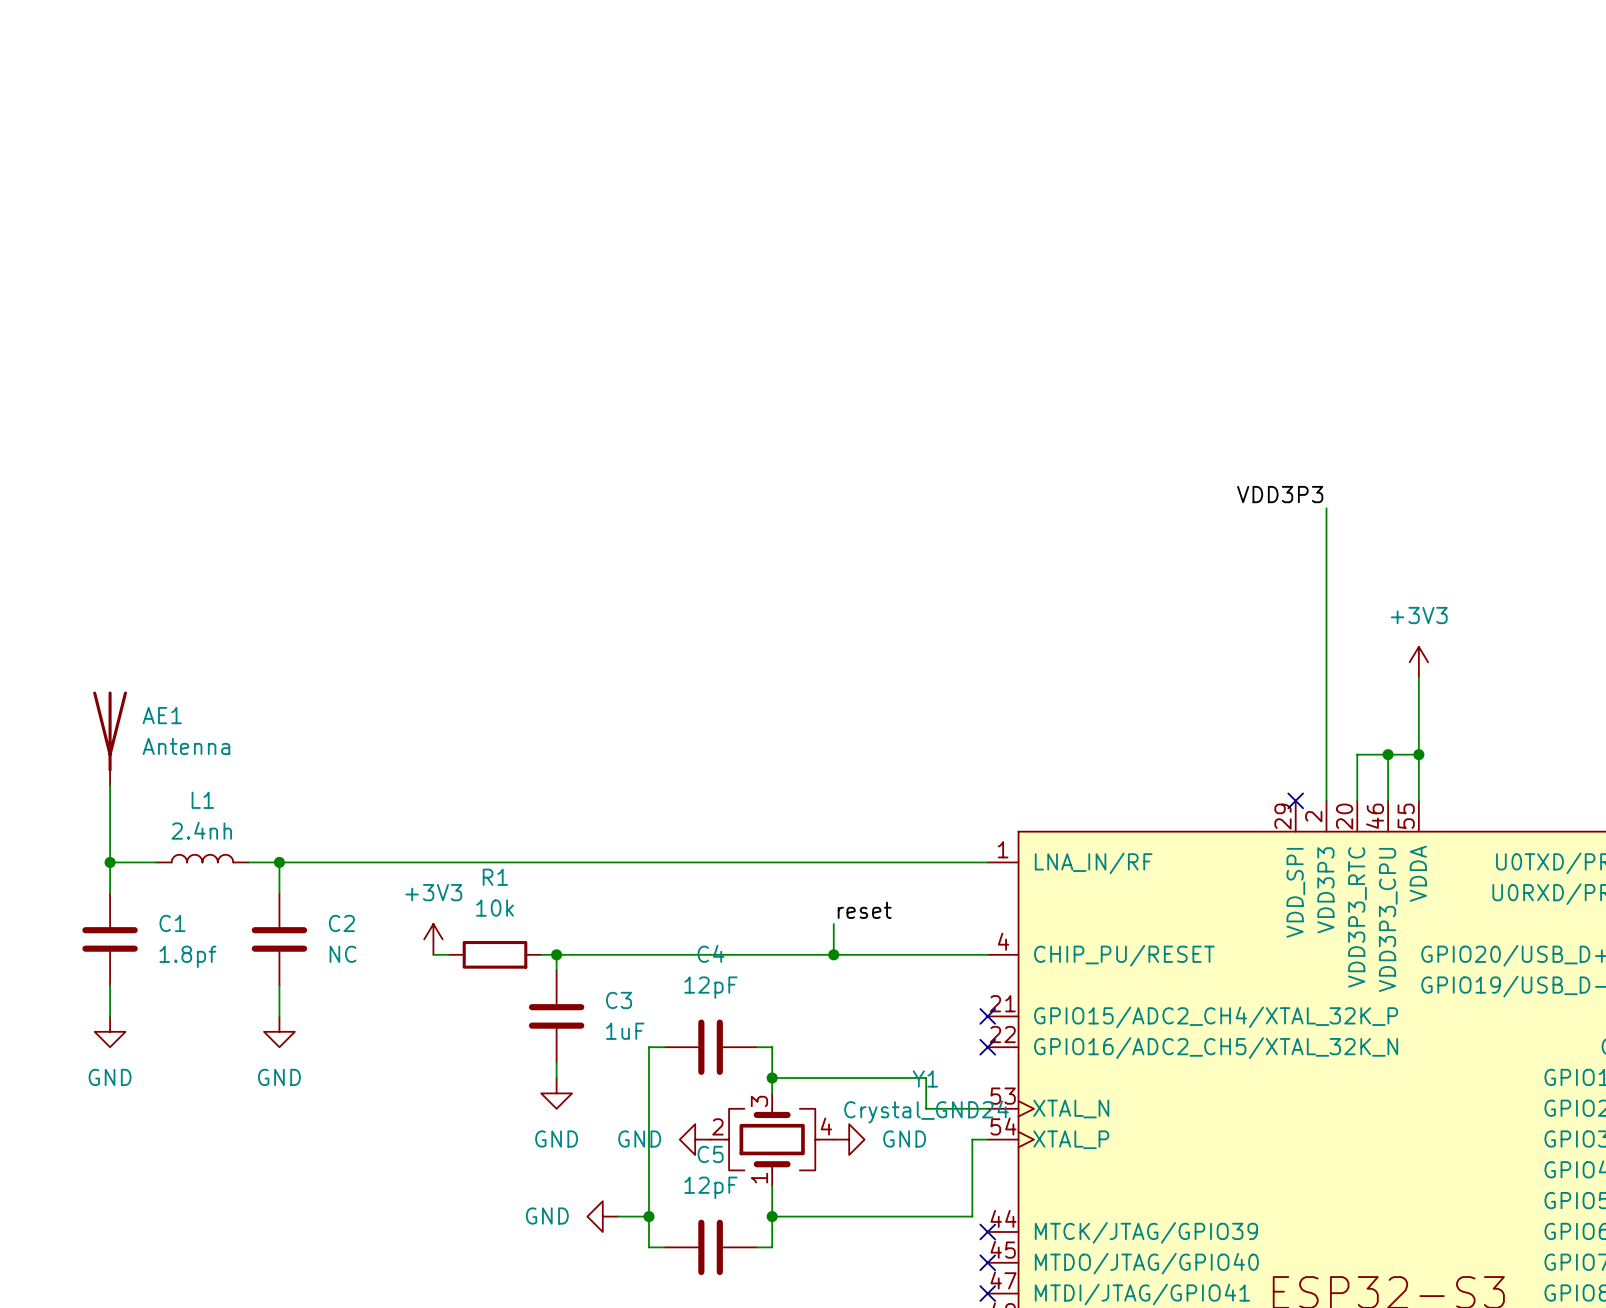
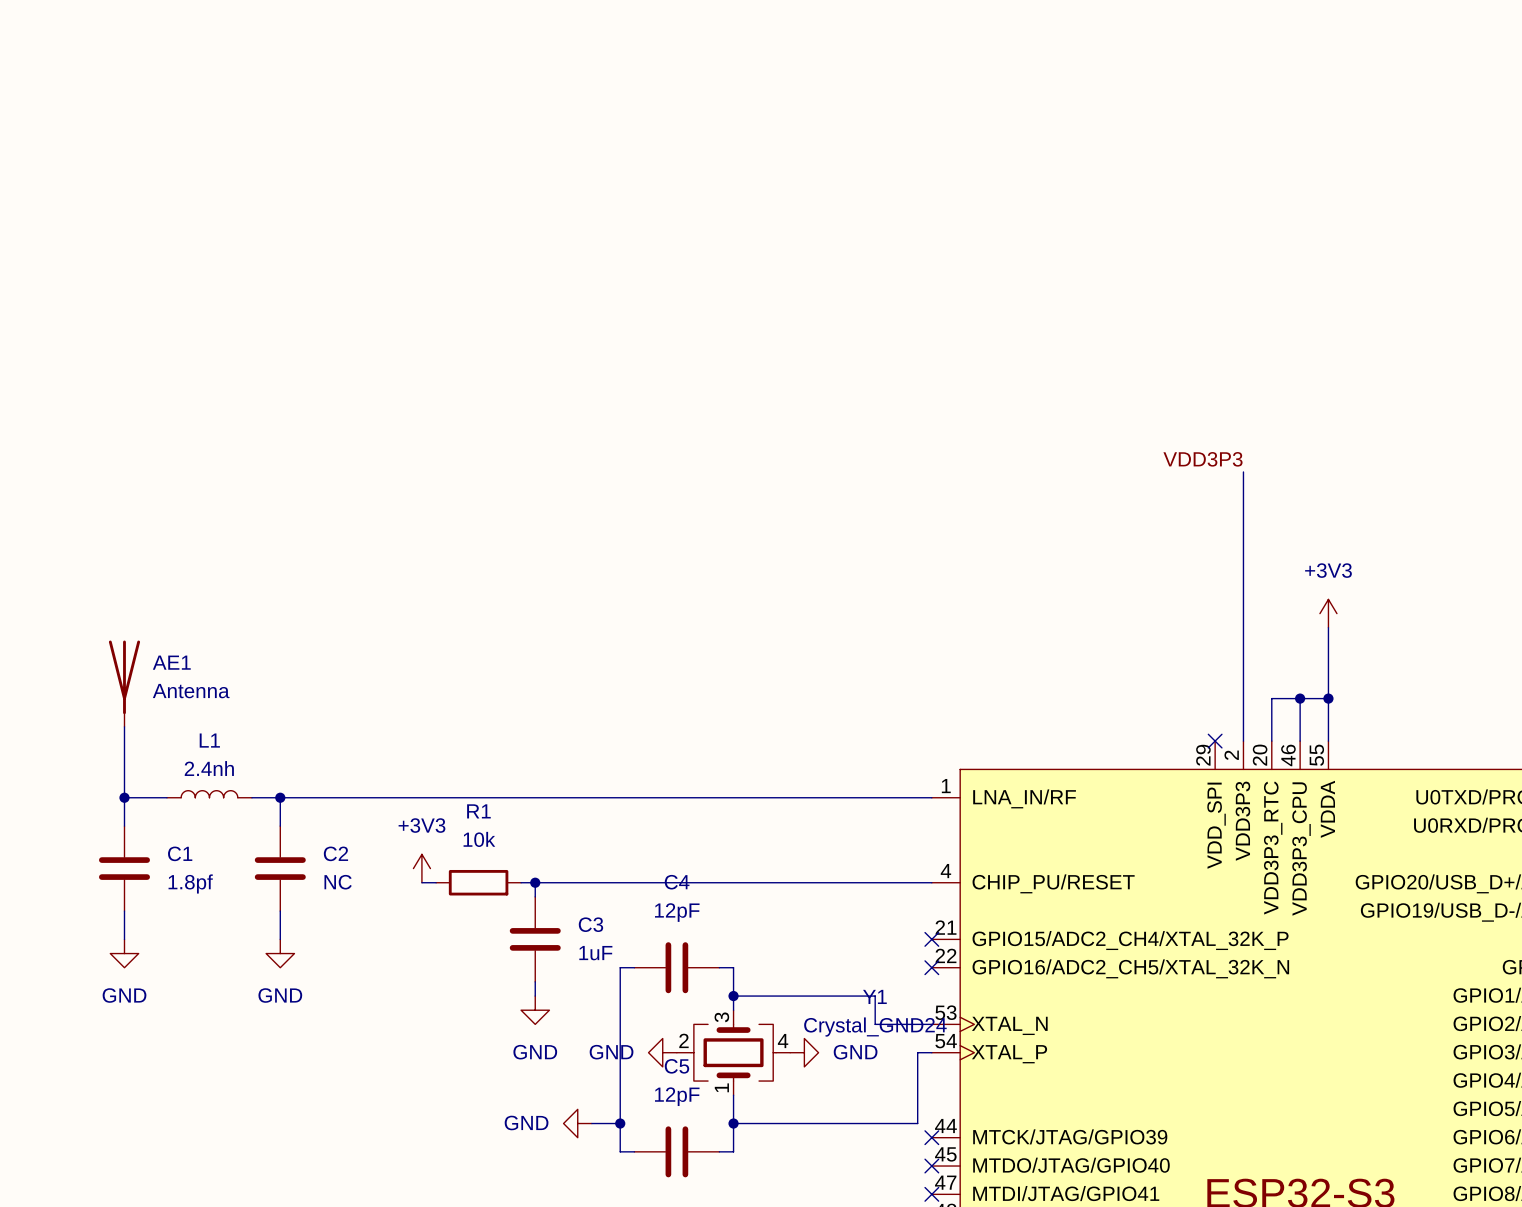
label: reset (864, 910) -> none
wire: (833, 924) (833, 954) -> none
junction: (833, 954) -> none

